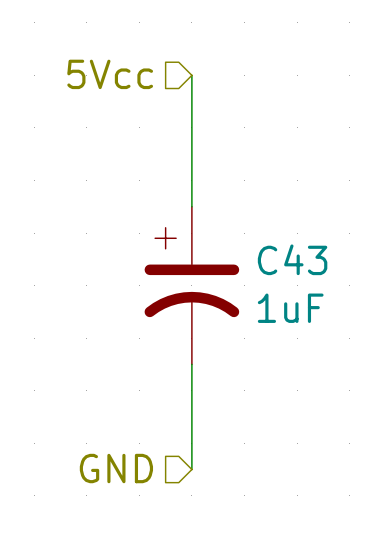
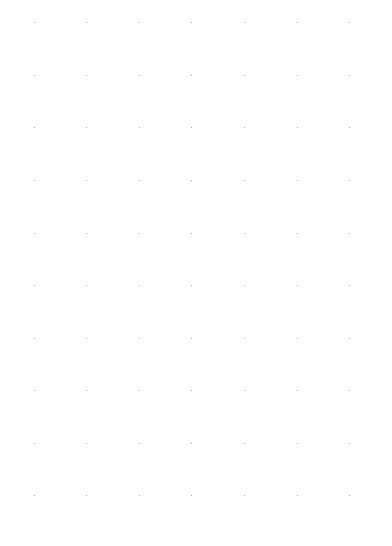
hierarchical label: 5Vcc (110, 74) -> none
wire: (191, 75) (191, 206) -> none
C43: 1uF (191, 285) -> none
wire: (191, 364) (191, 469) -> none
hierarchical label: GND (116, 468) -> none

